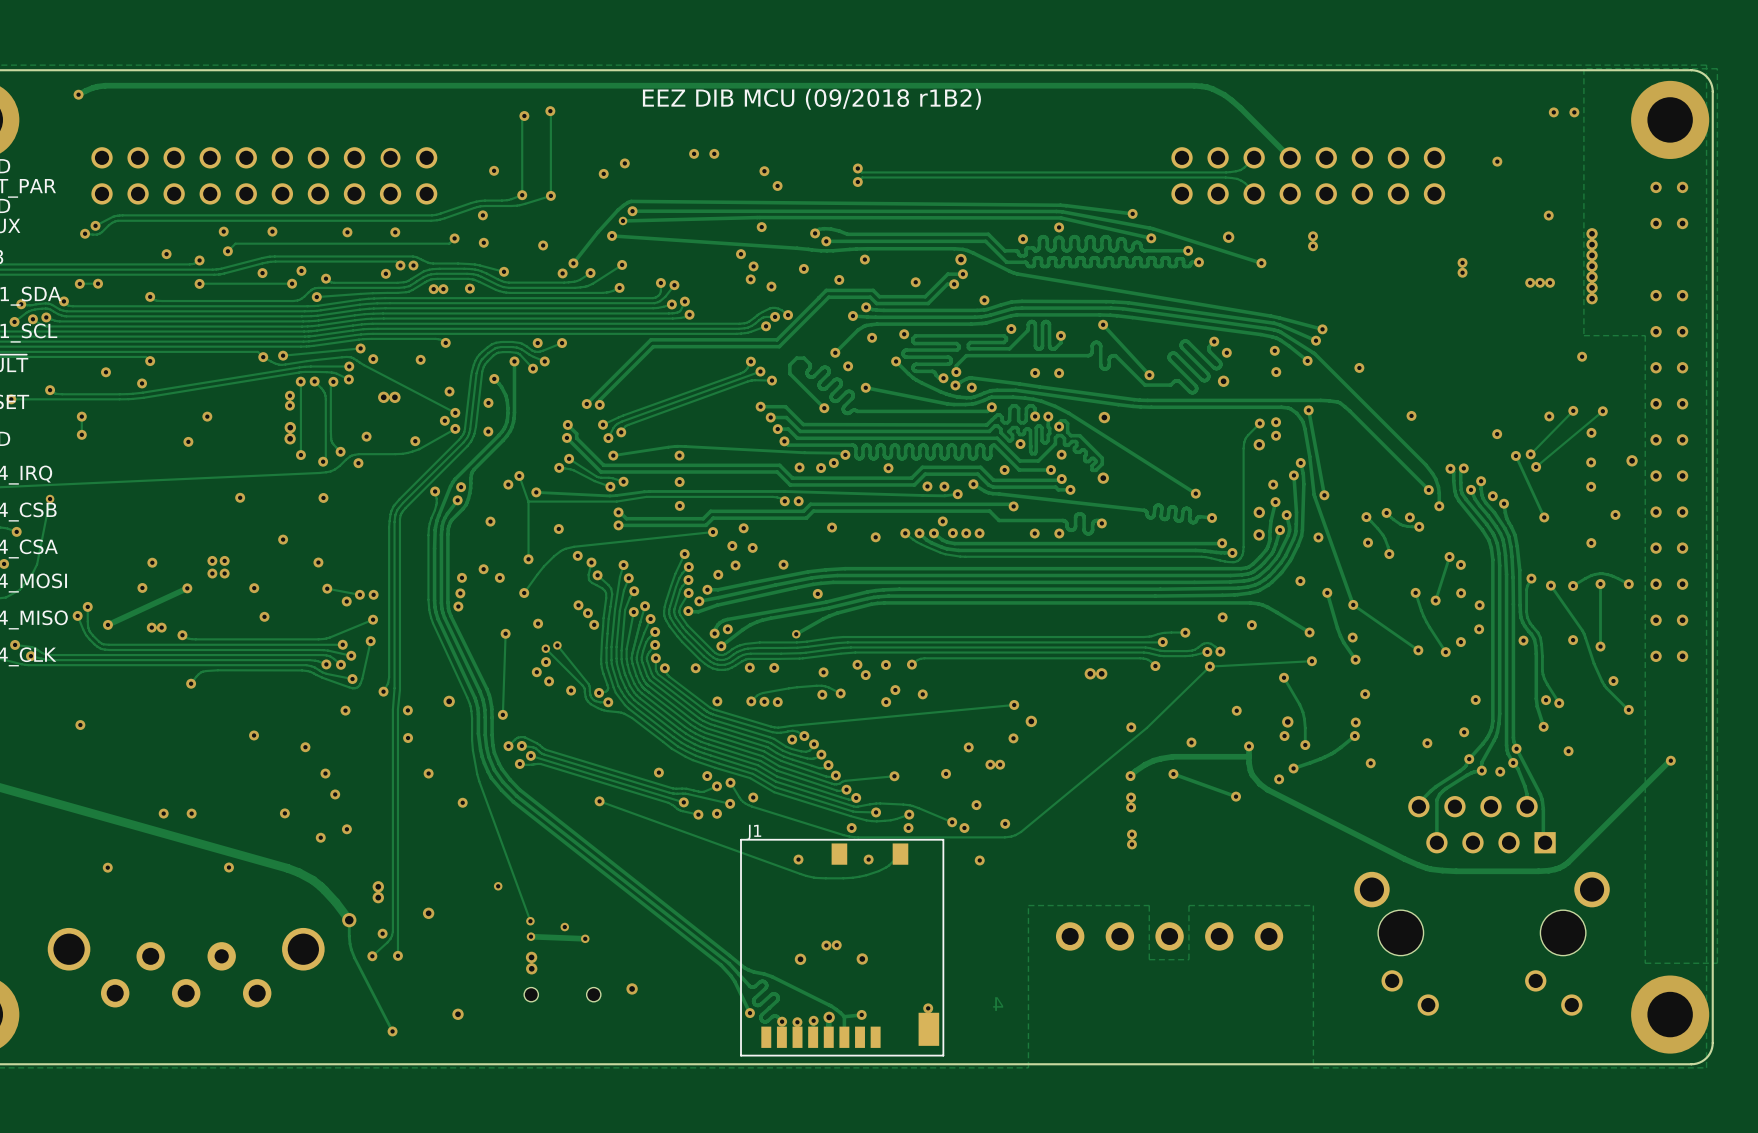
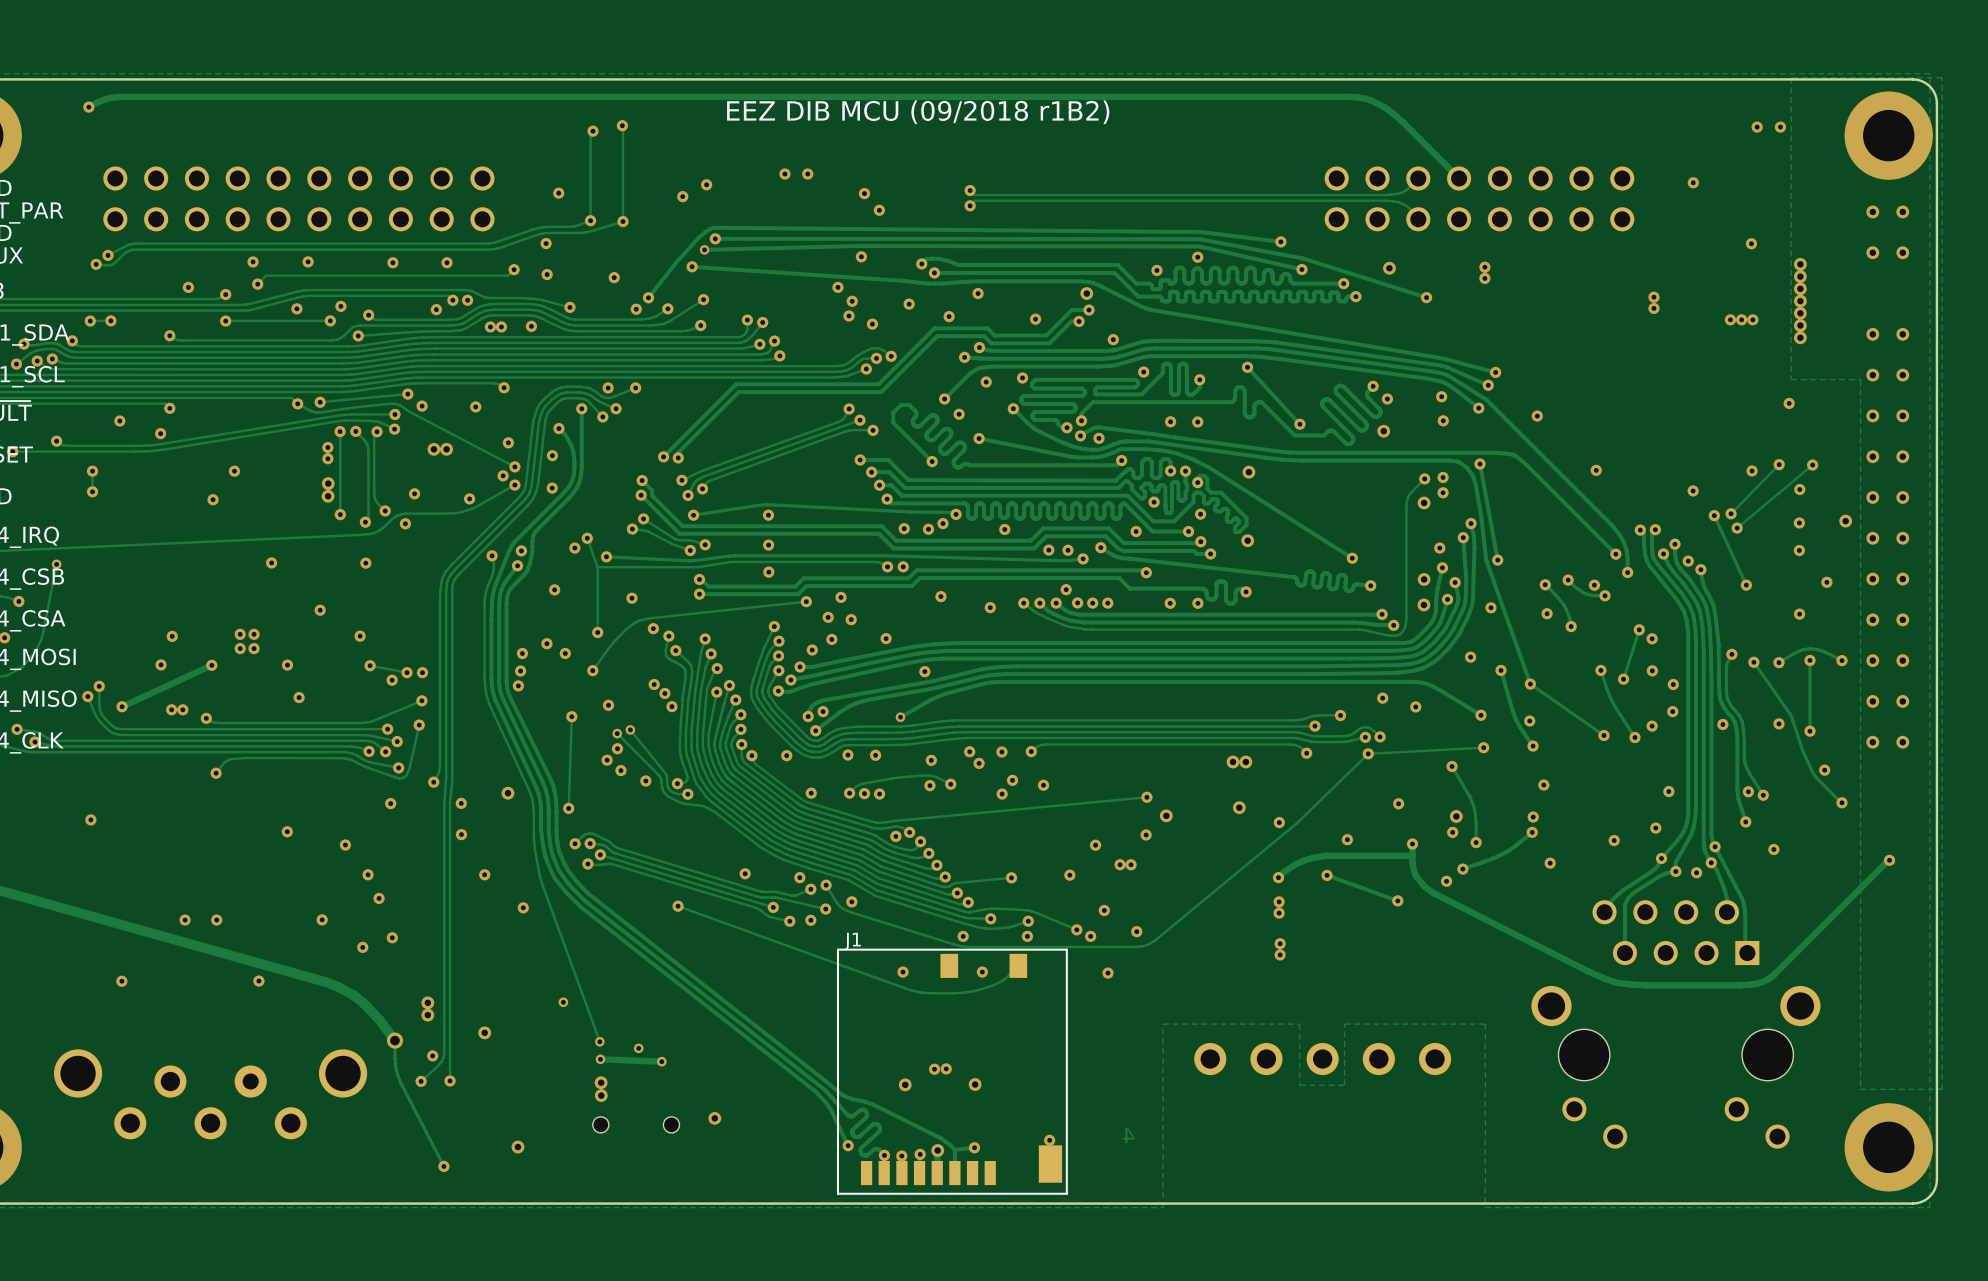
via: none -> (1239, 807)

